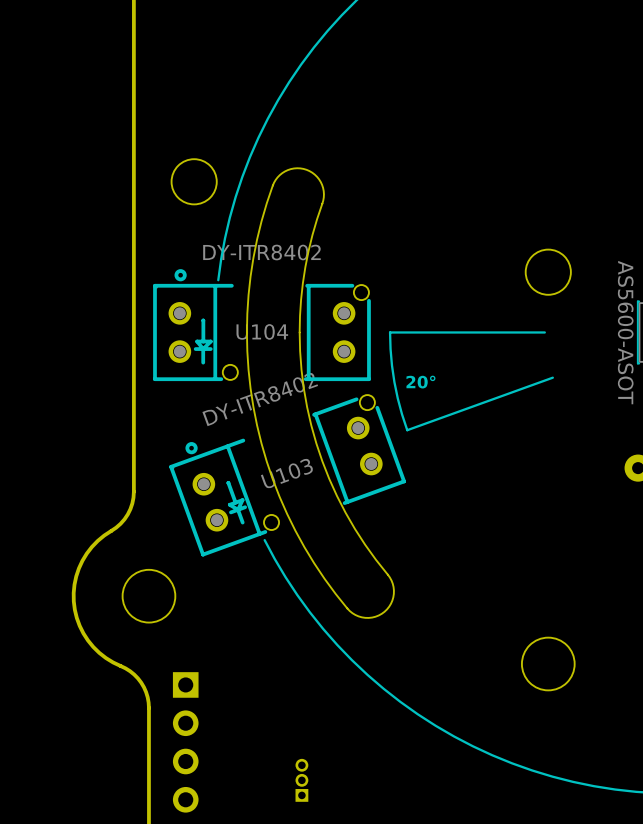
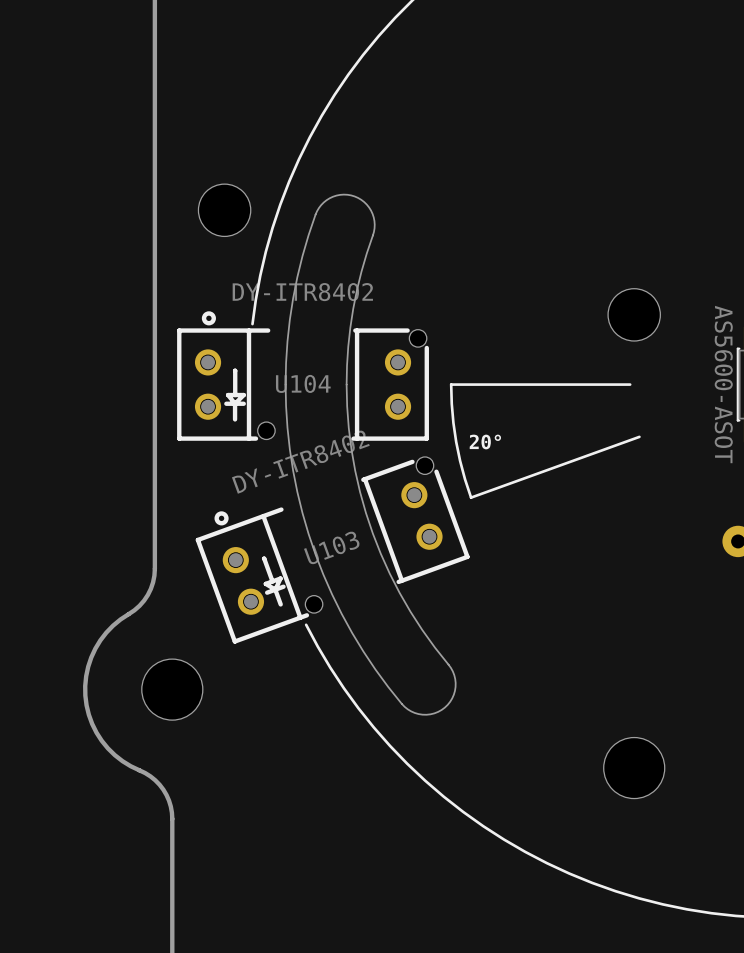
part: (185, 742) -> none
part: (301, 780) -> none

